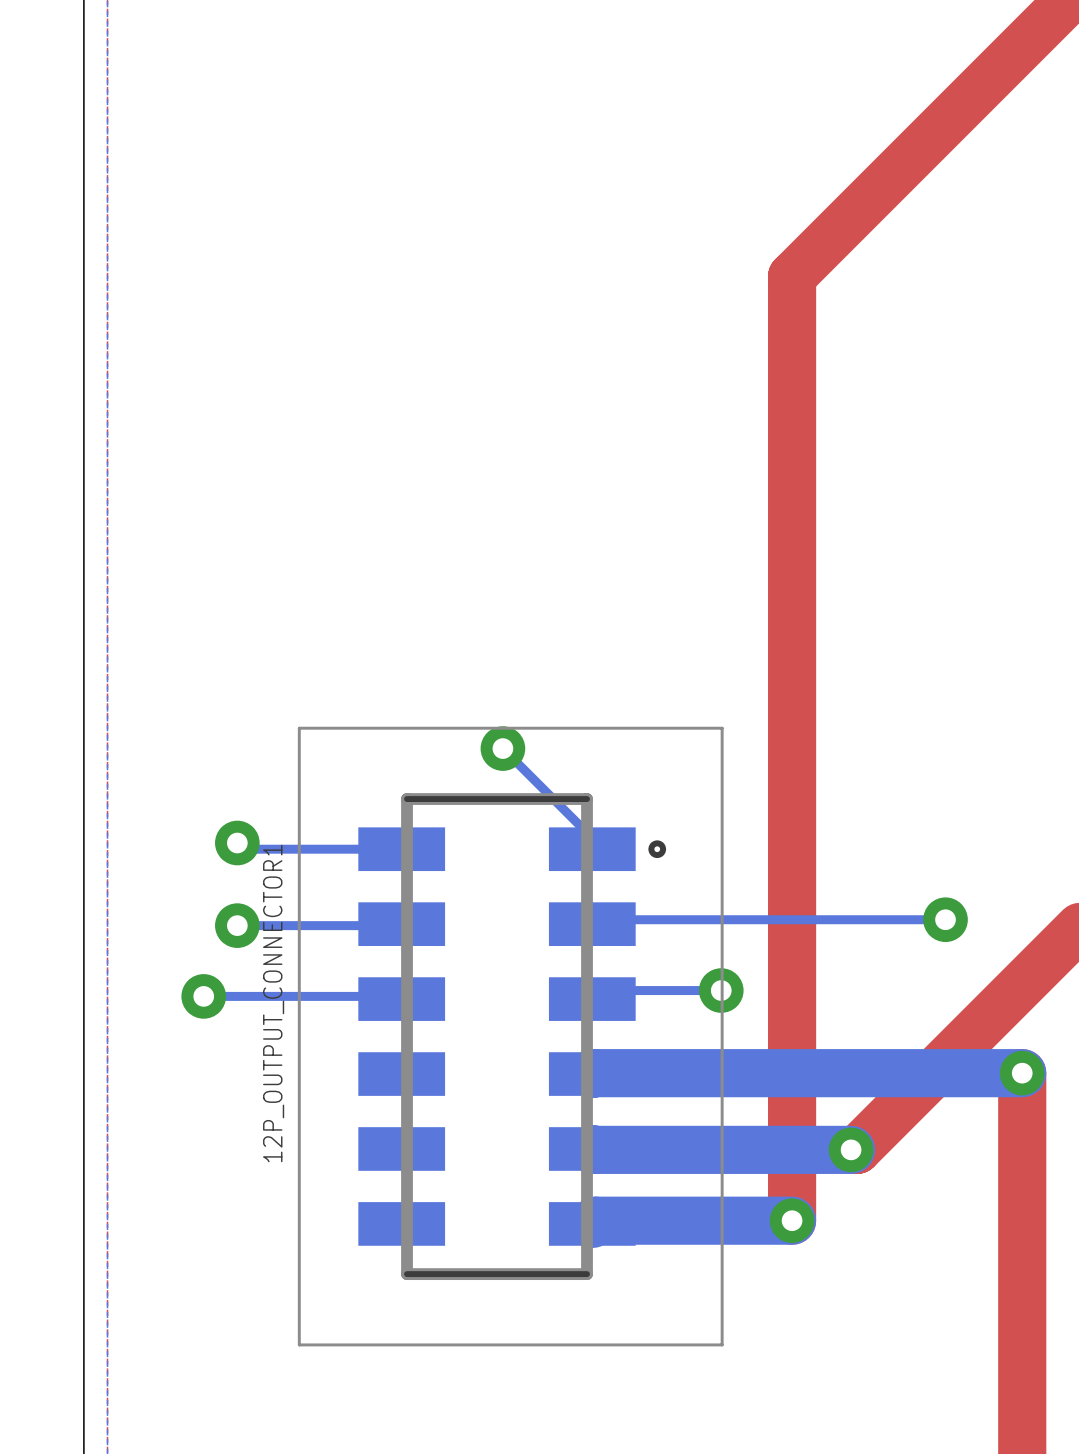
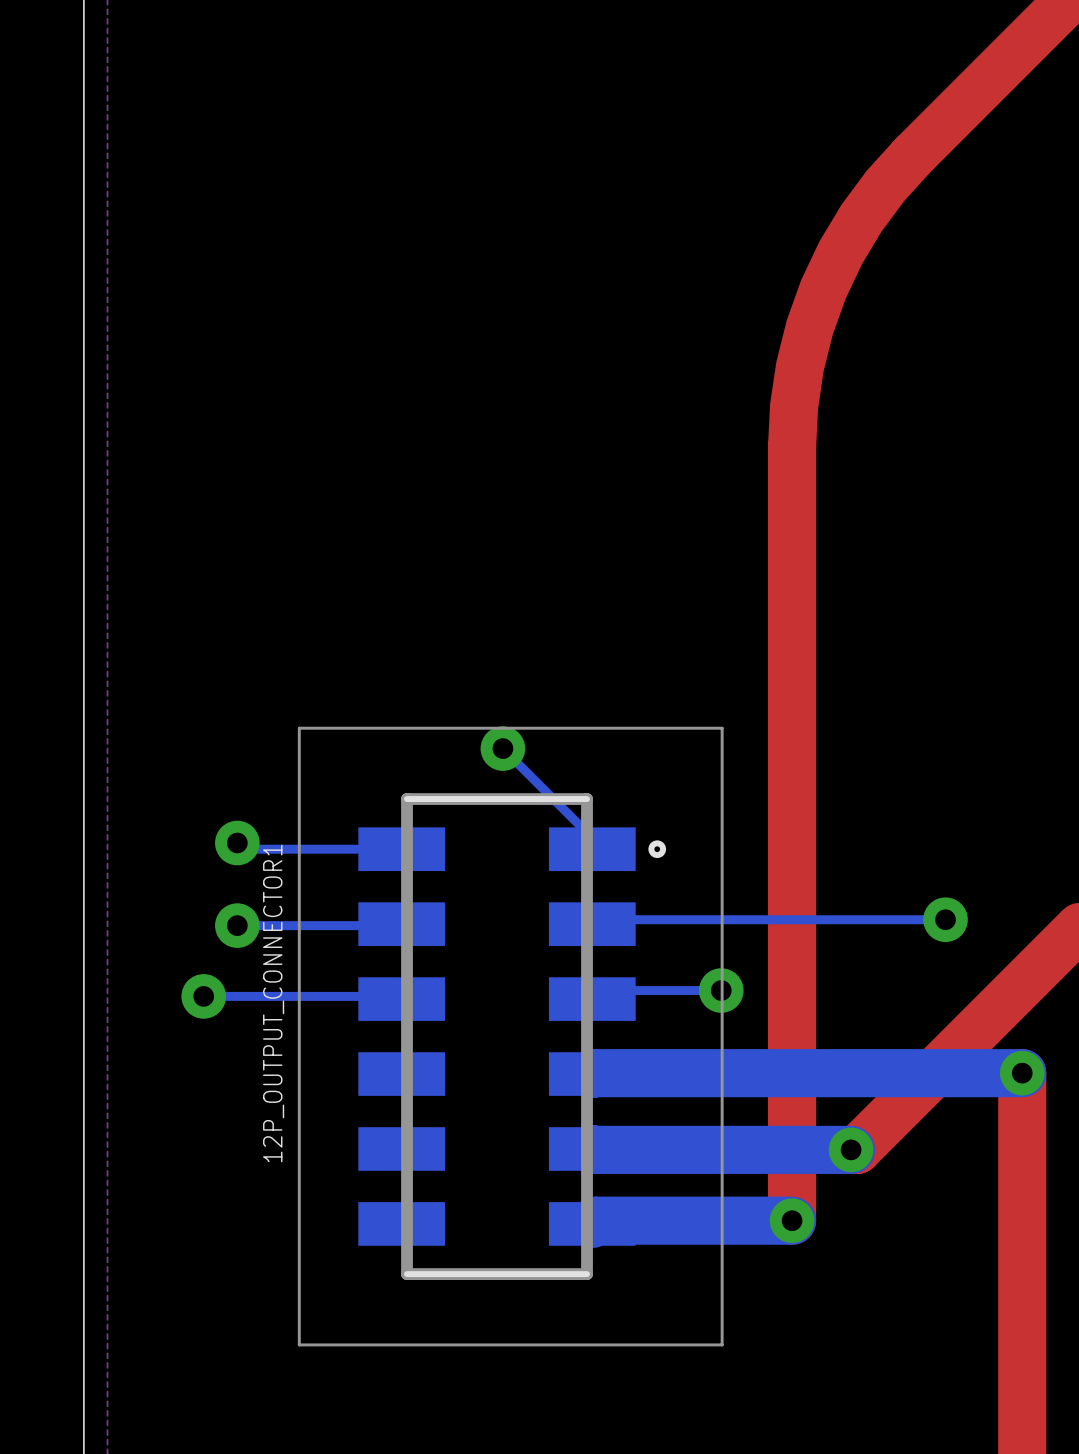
top track: (912, 155) (792, 276) (792, 446) -> (912, 155) (885, 185) (861, 218) (840, 252) (823, 289) (809, 327) (799, 366) (794, 406) (792, 446)

